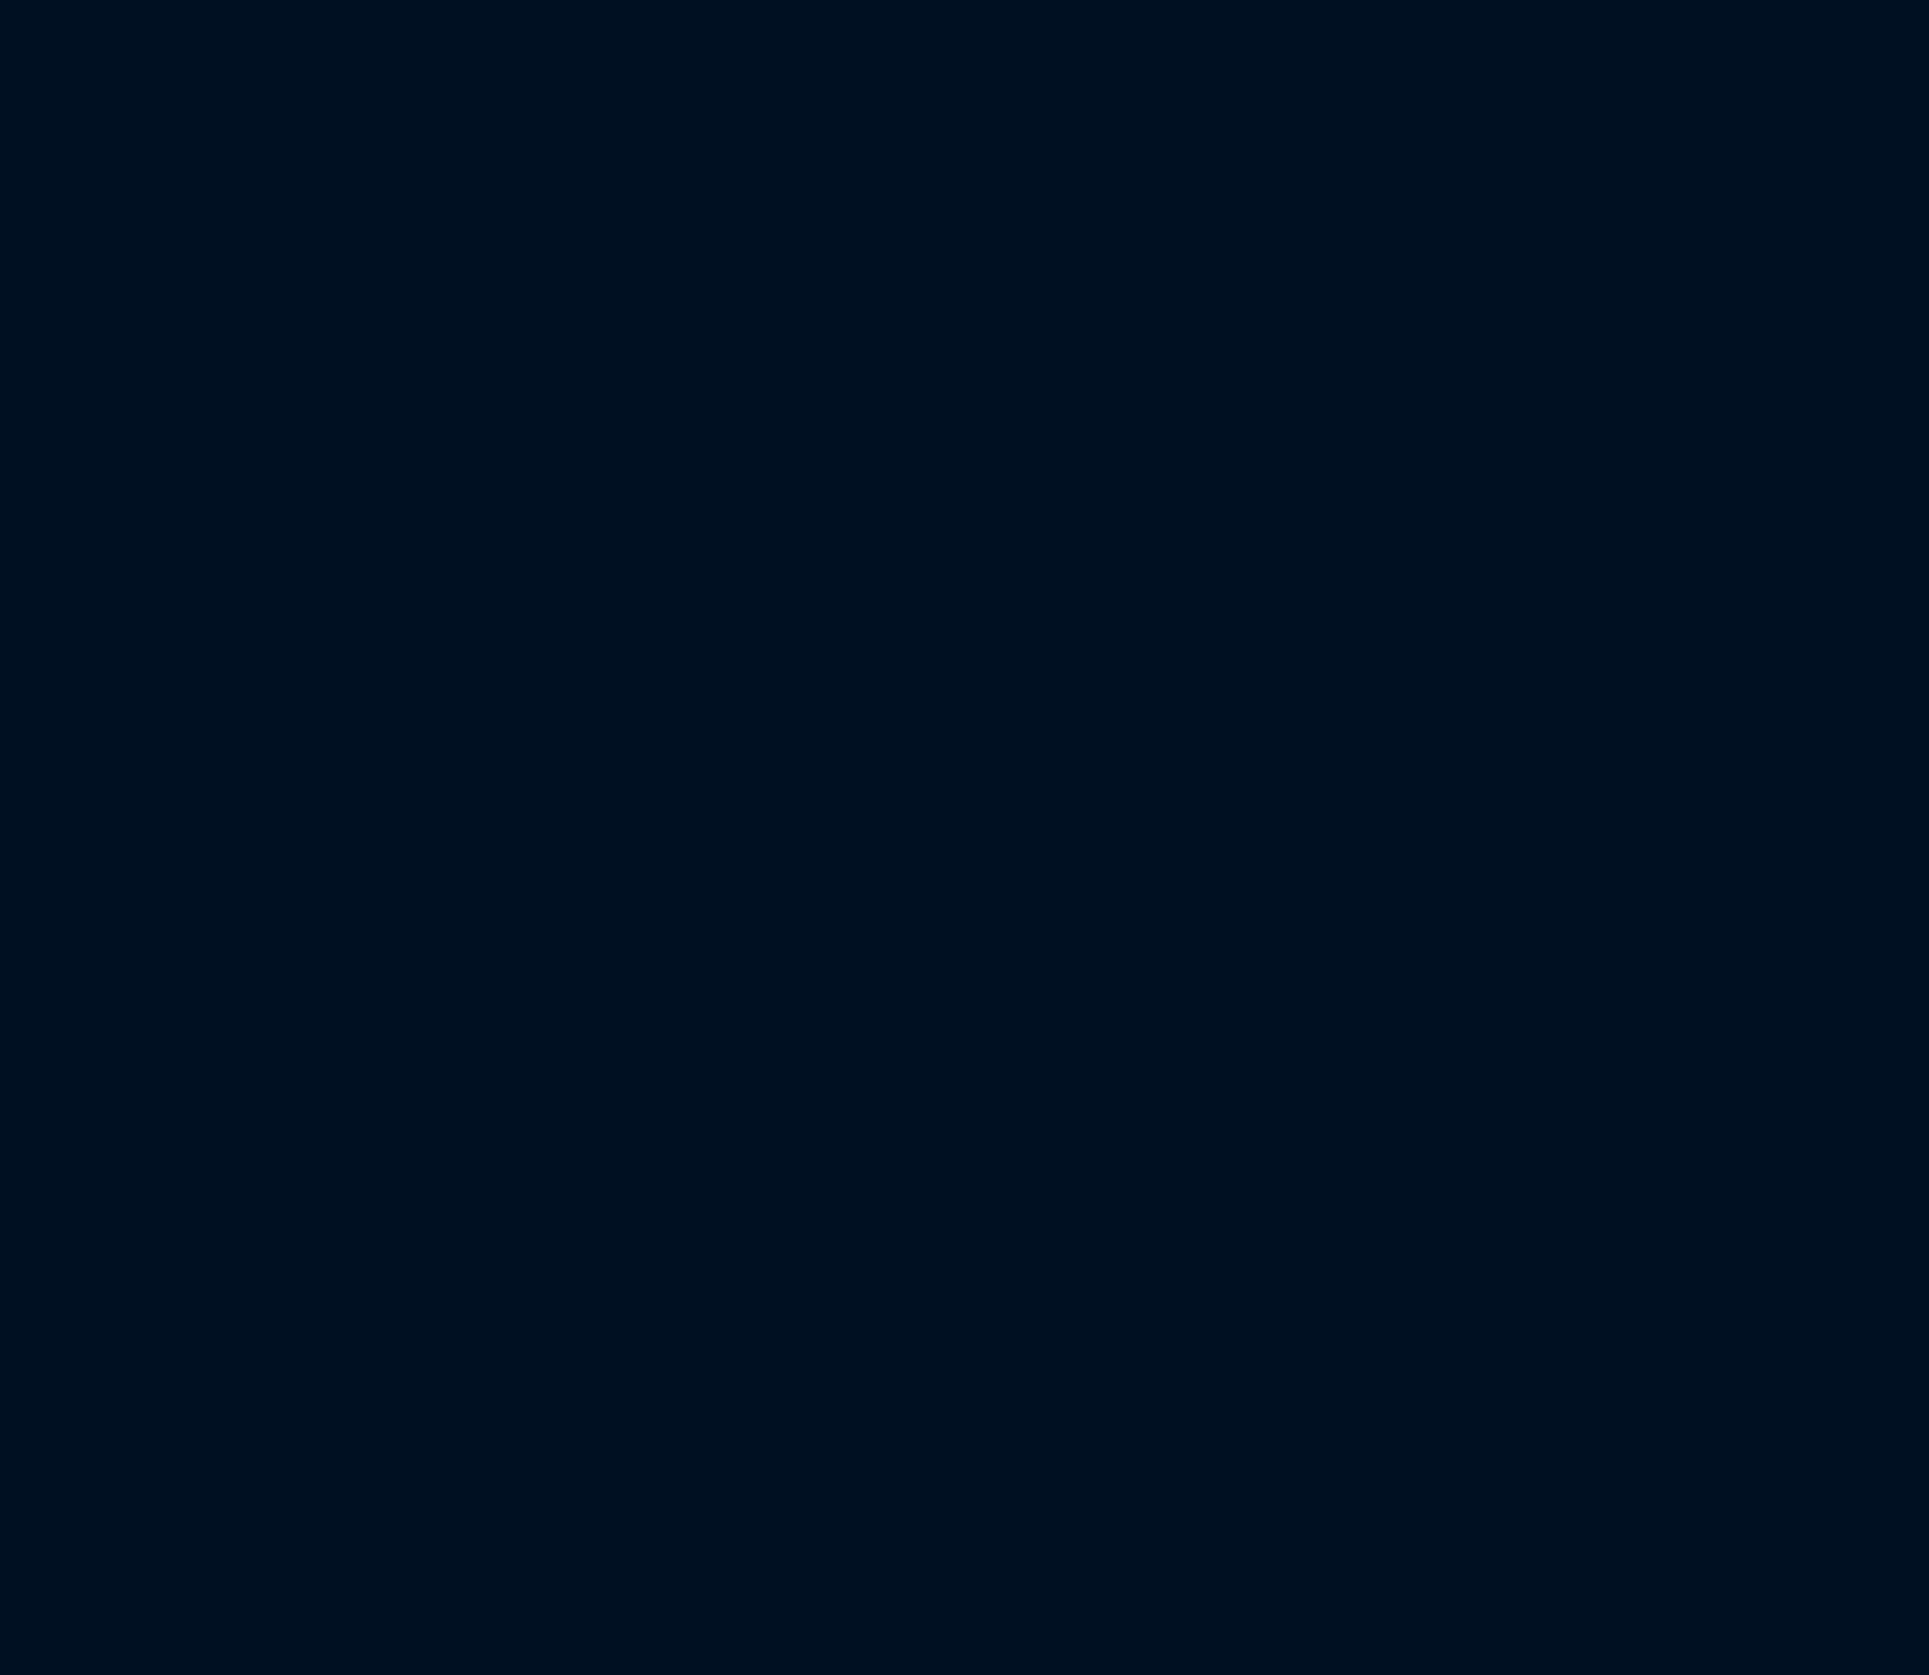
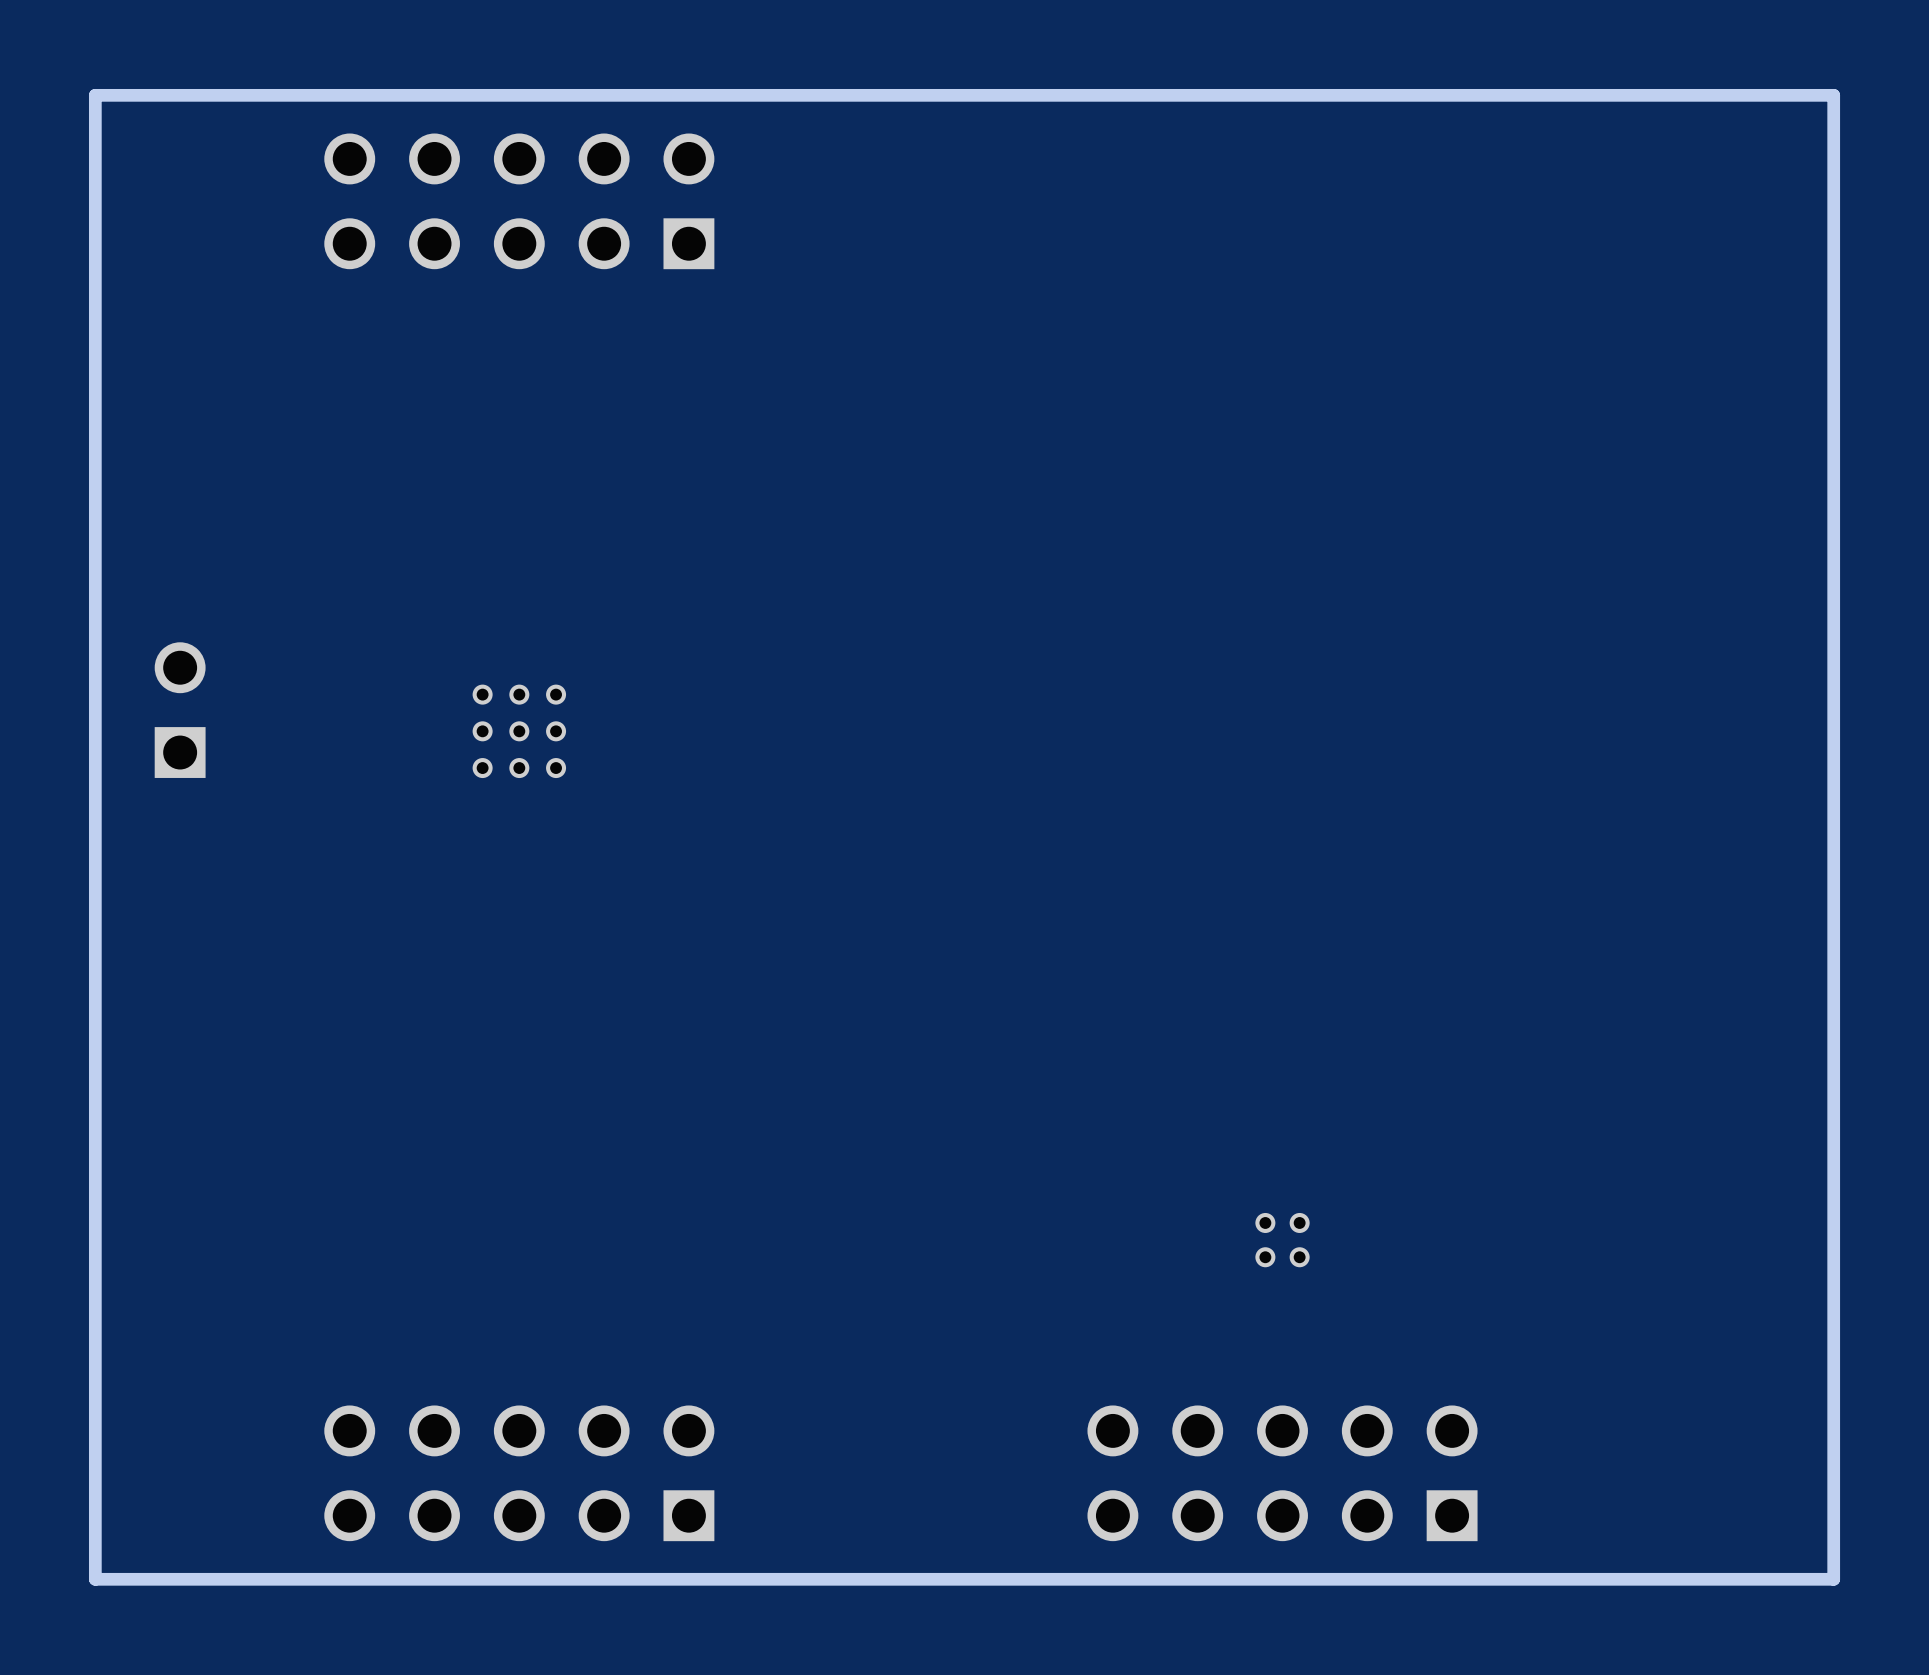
board edge: none -> (1833, 95) (1833, 1579) (95, 1579) (95, 95) (1833, 95)
part: none -> (519, 201)
part: none -> (180, 710)
part: none -> (519, 731)
part: none -> (1282, 1240)
part: none -> (519, 1473)
part: none -> (1282, 1473)

